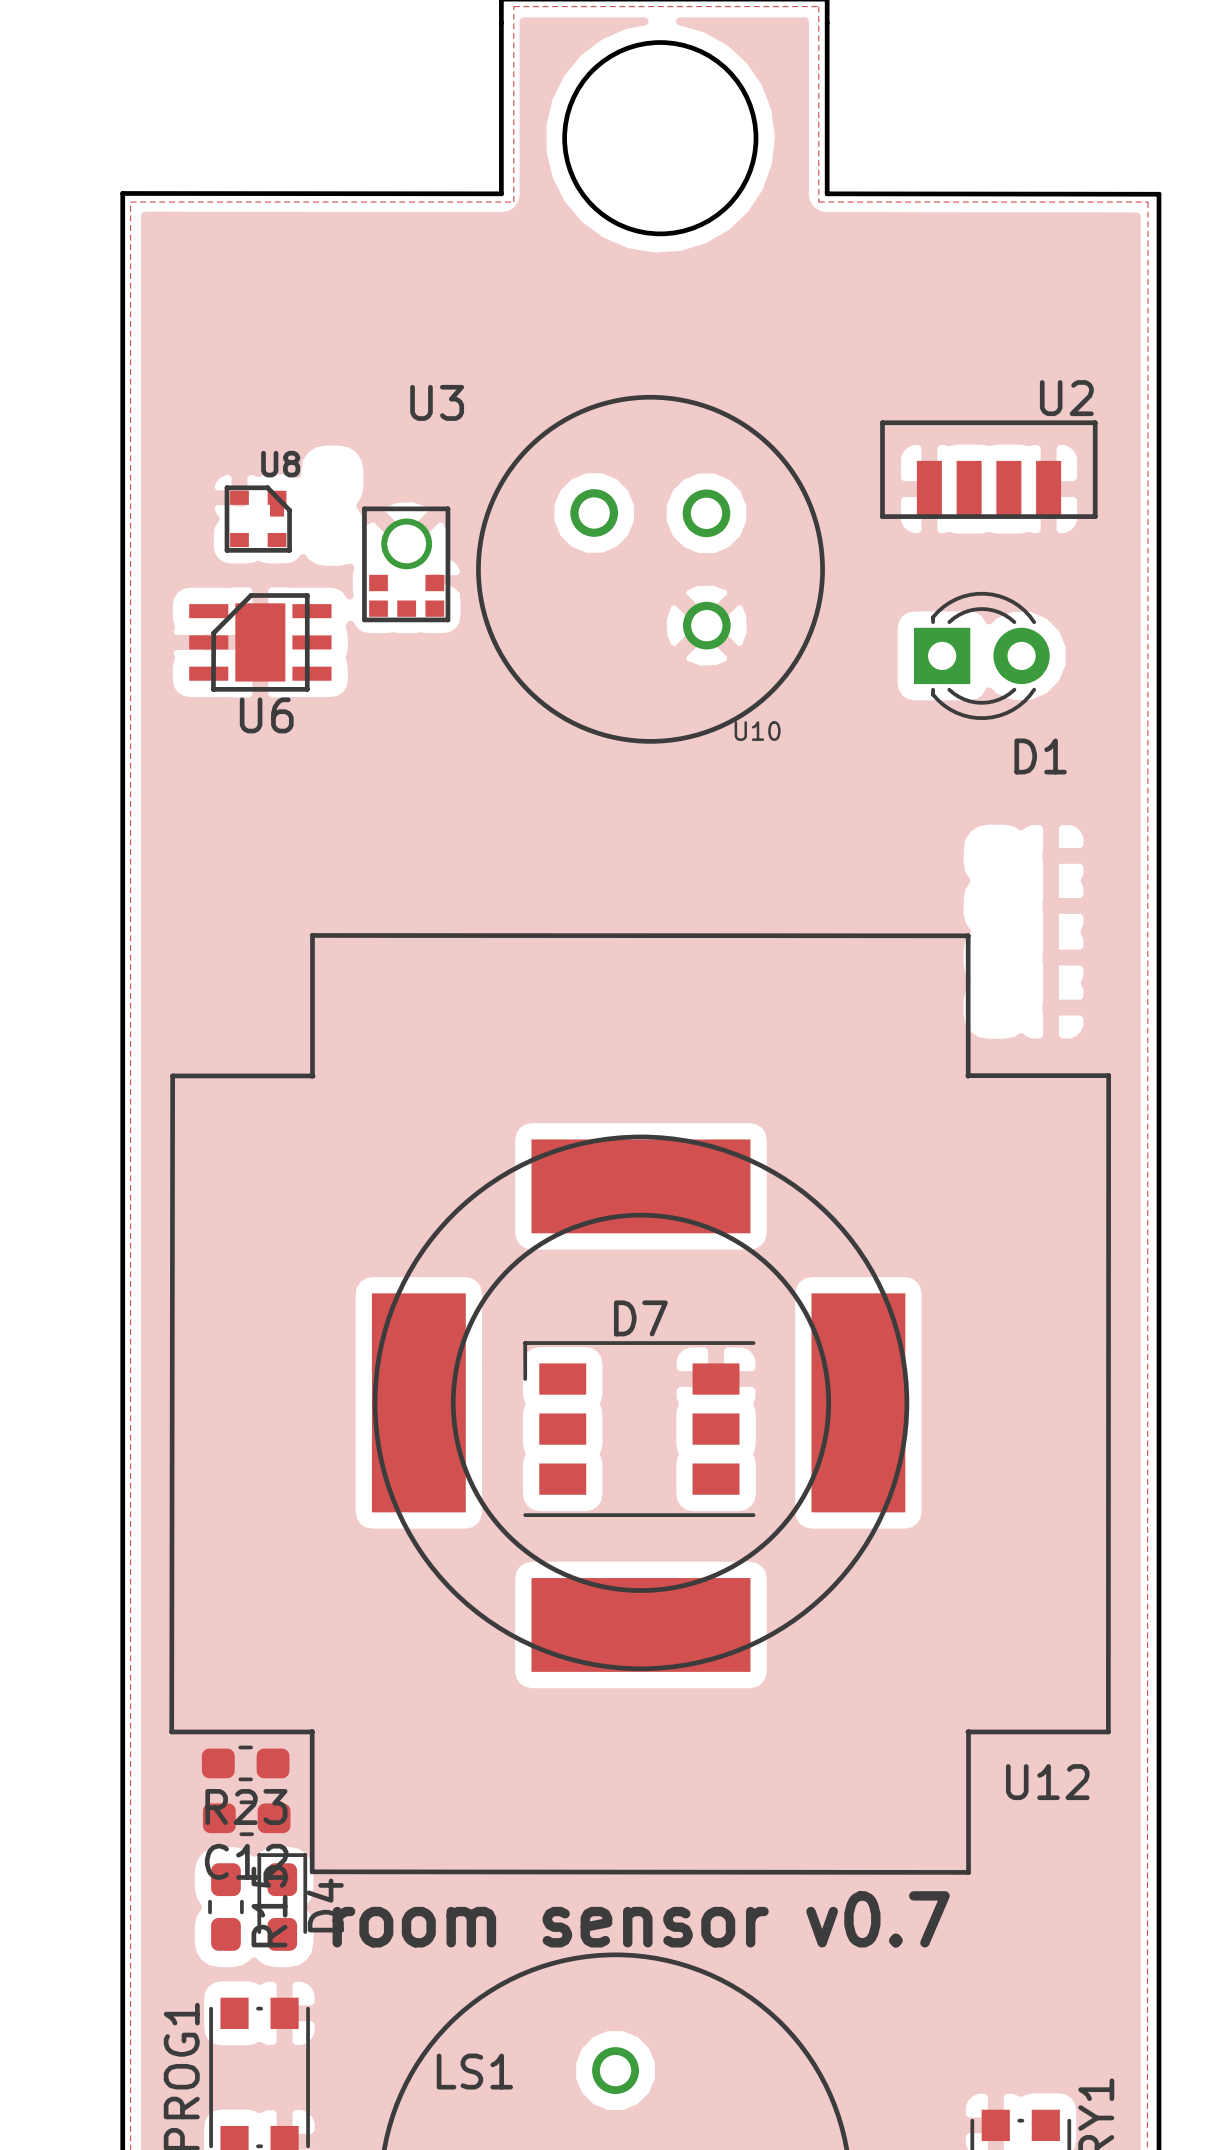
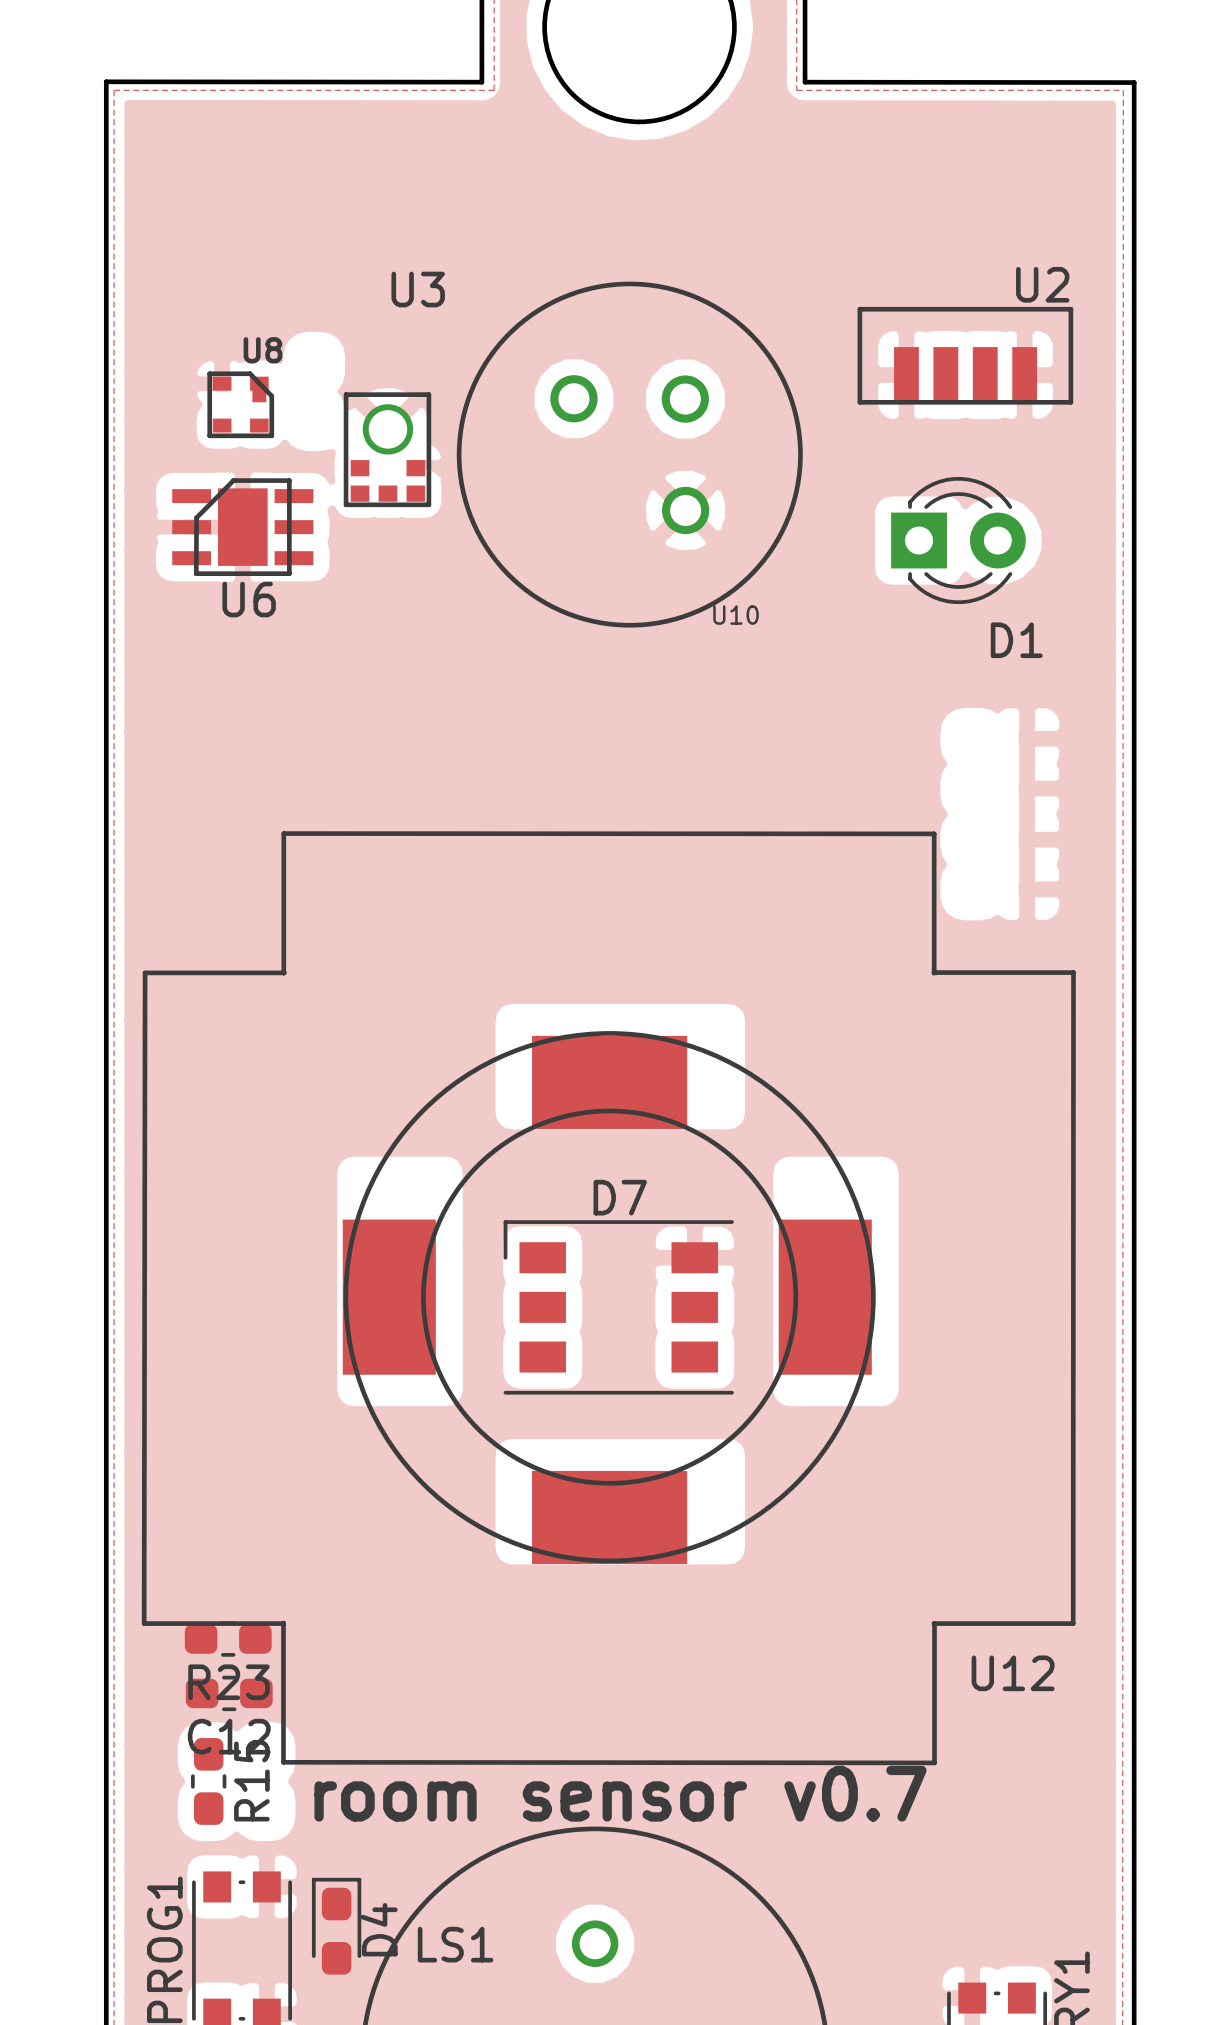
U12 footprint: [169, 933, 1112, 1875] -> [141, 831, 1076, 1766]
D4 position: (282, 1902) -> (336, 1926)

